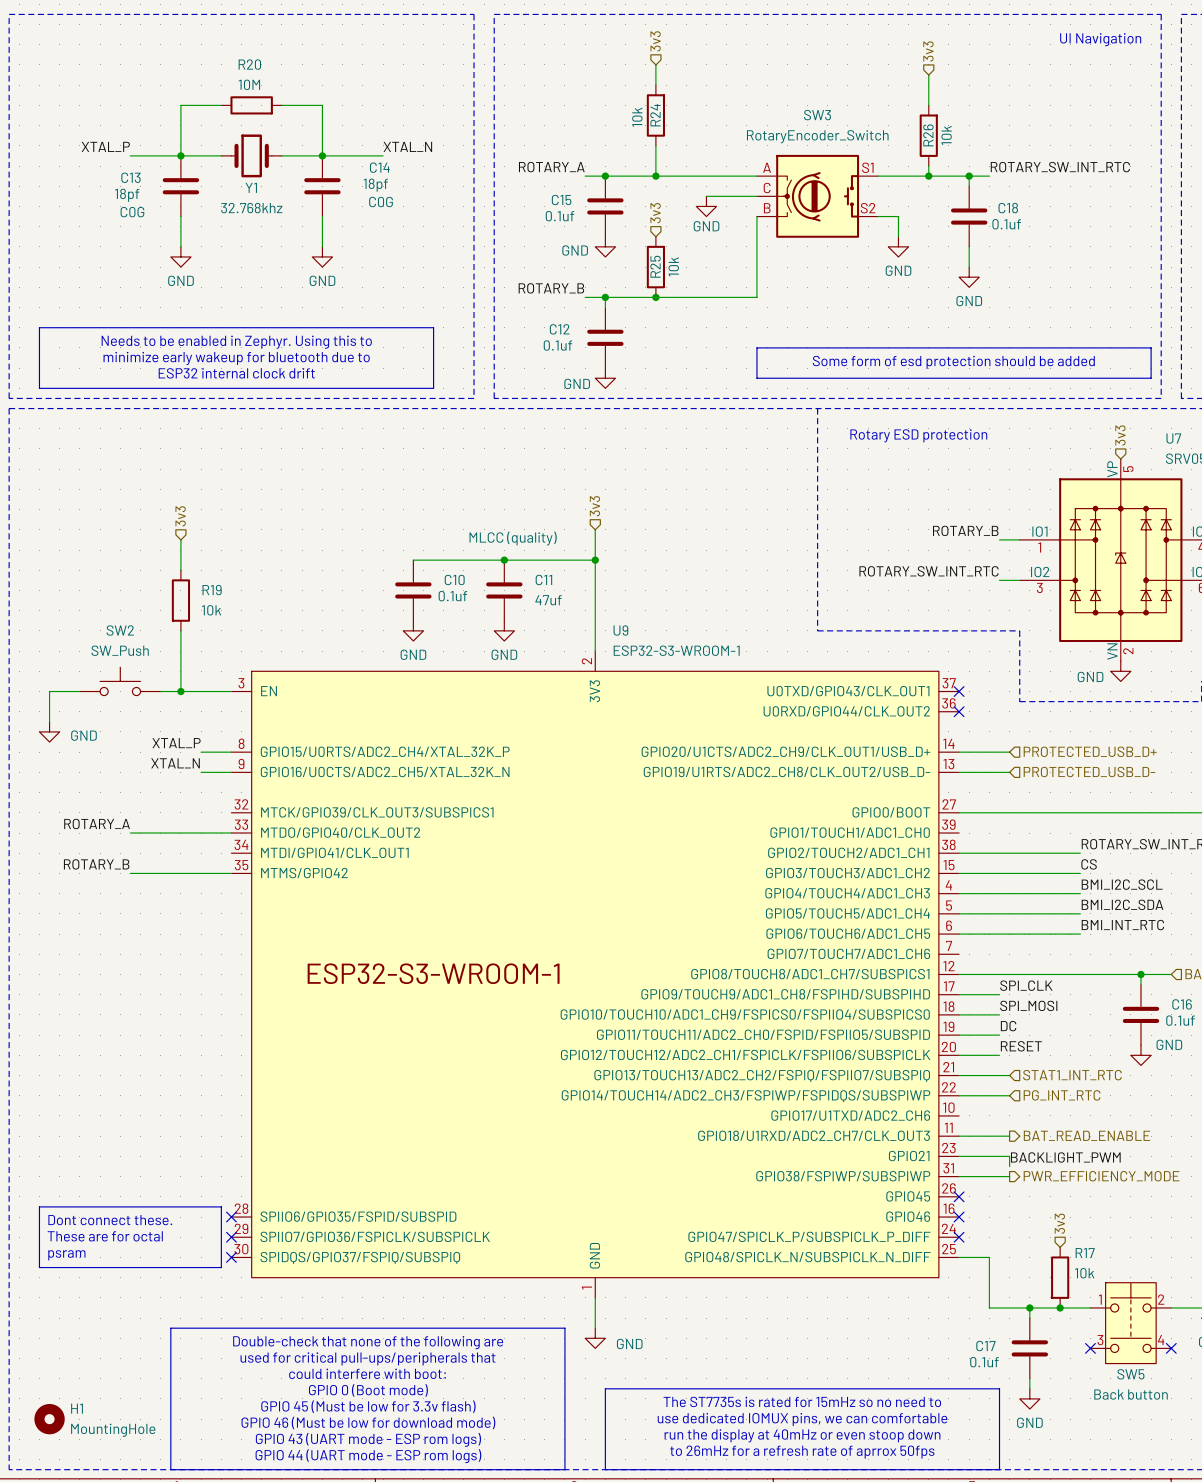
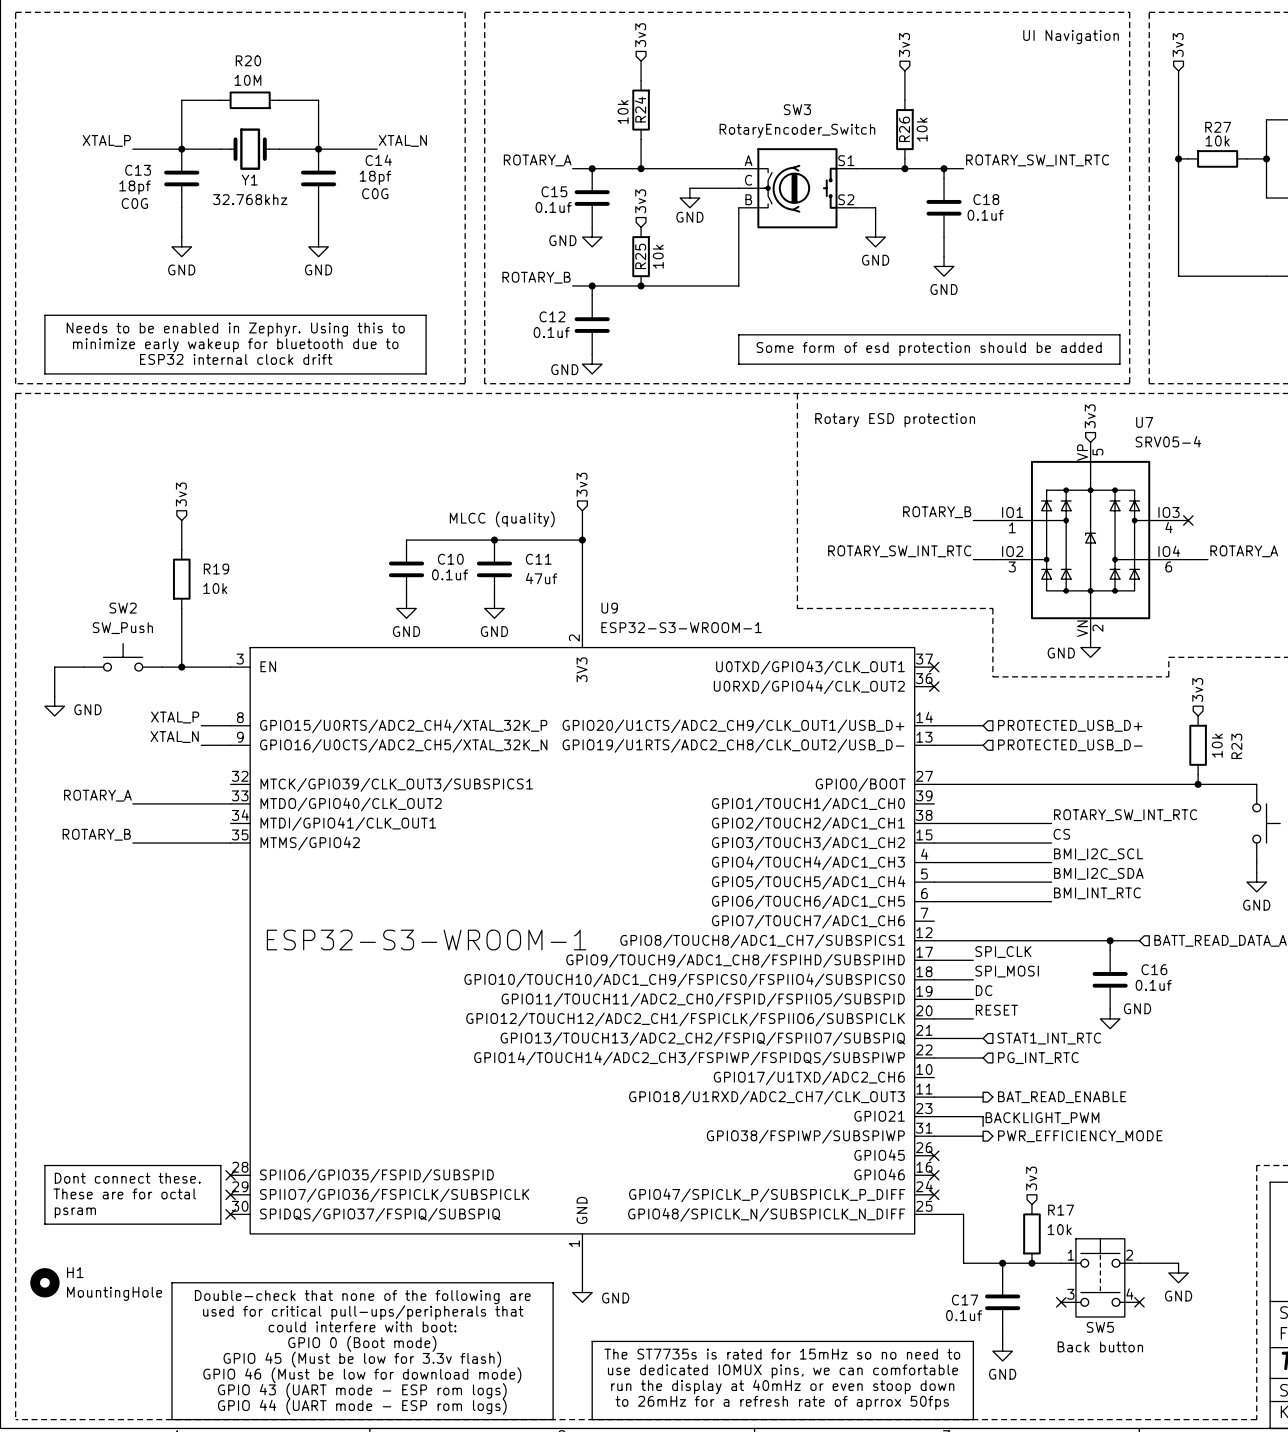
H1 position: (49, 1419) -> (44, 1282)

